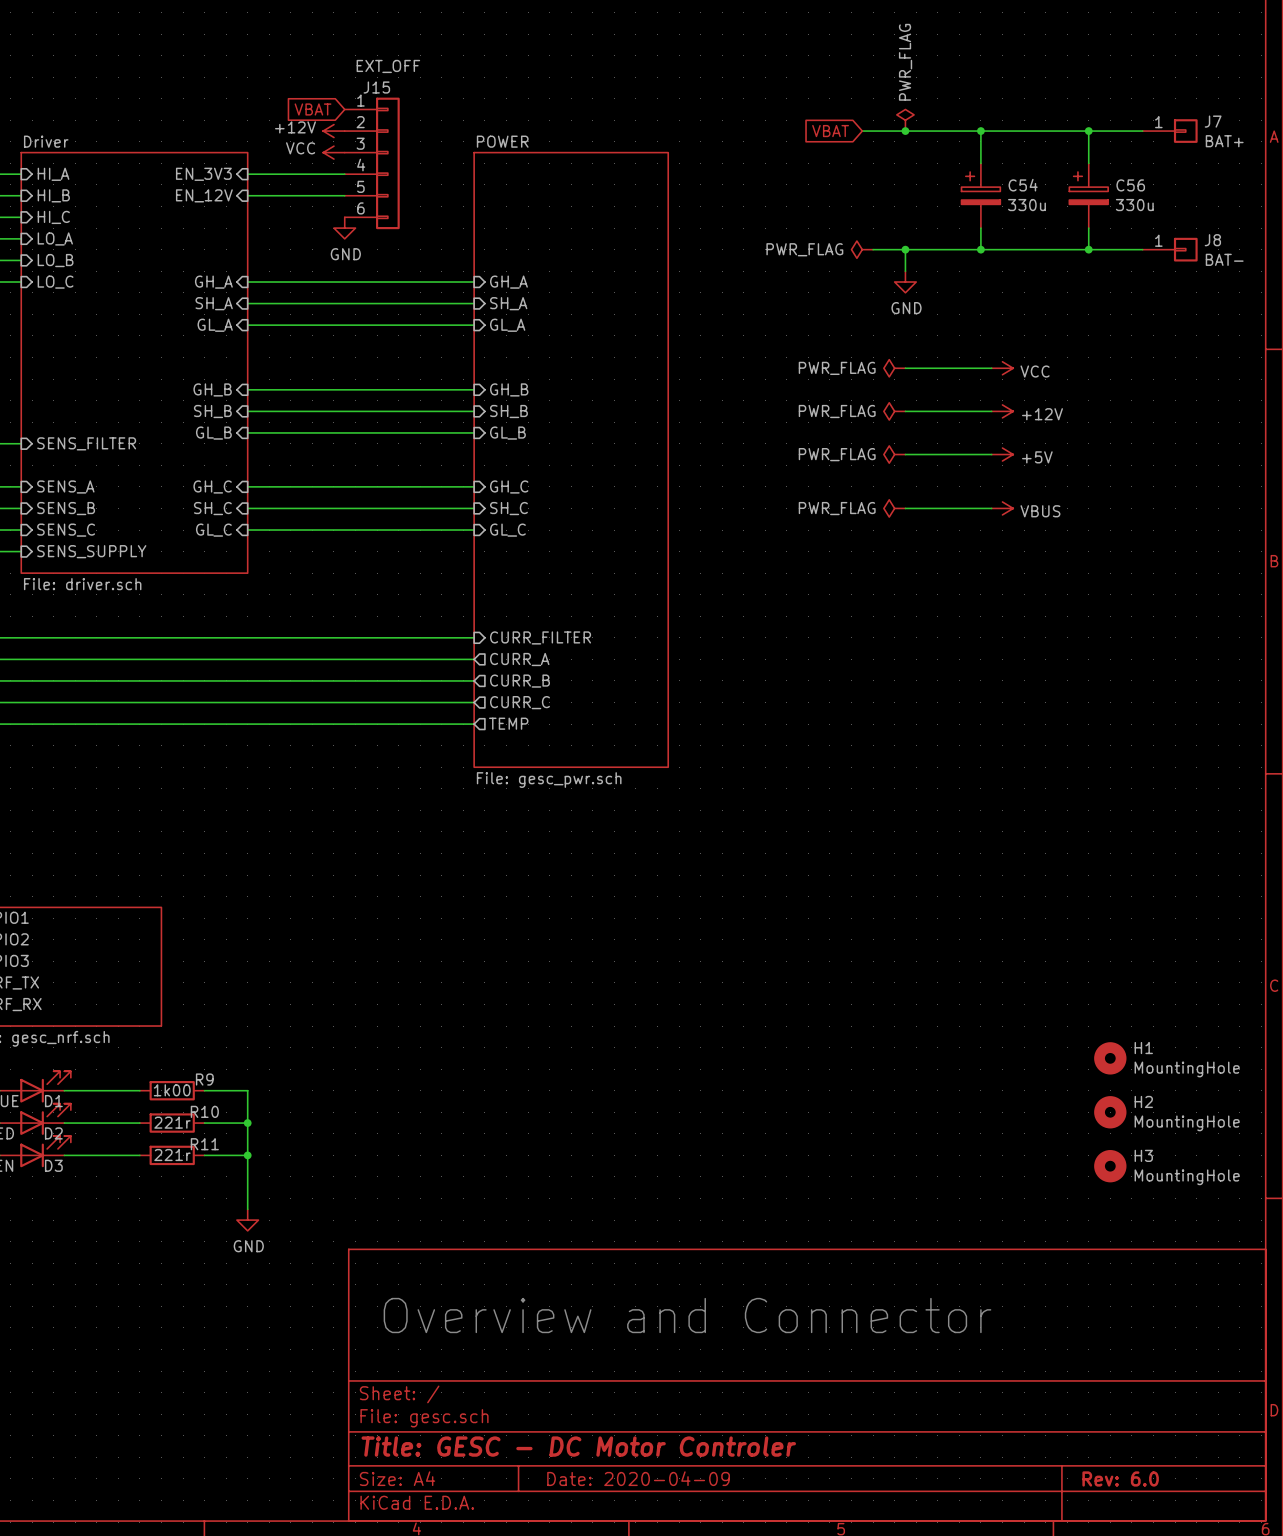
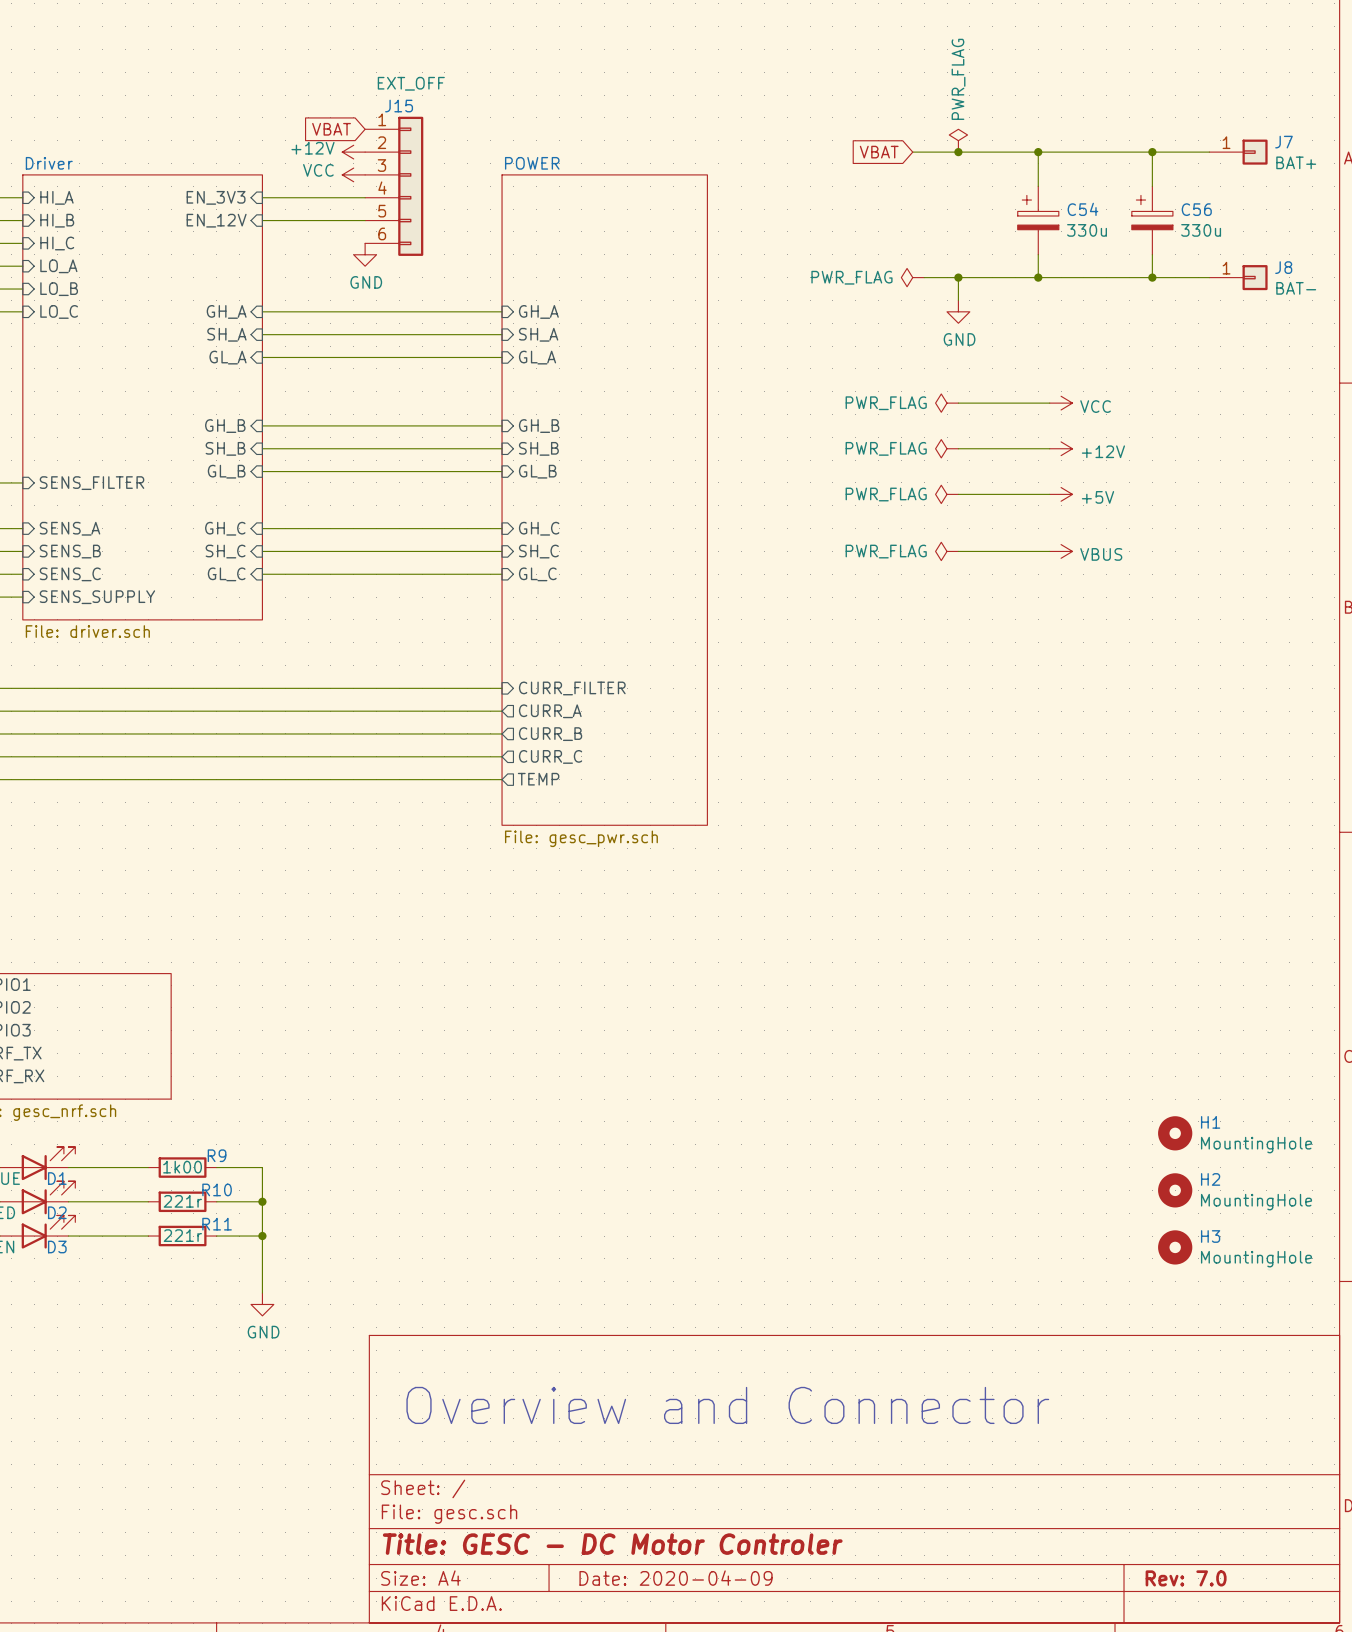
title block: Rev: 6.0 (1120, 1478) -> Rev: 7.0 (1186, 1578)

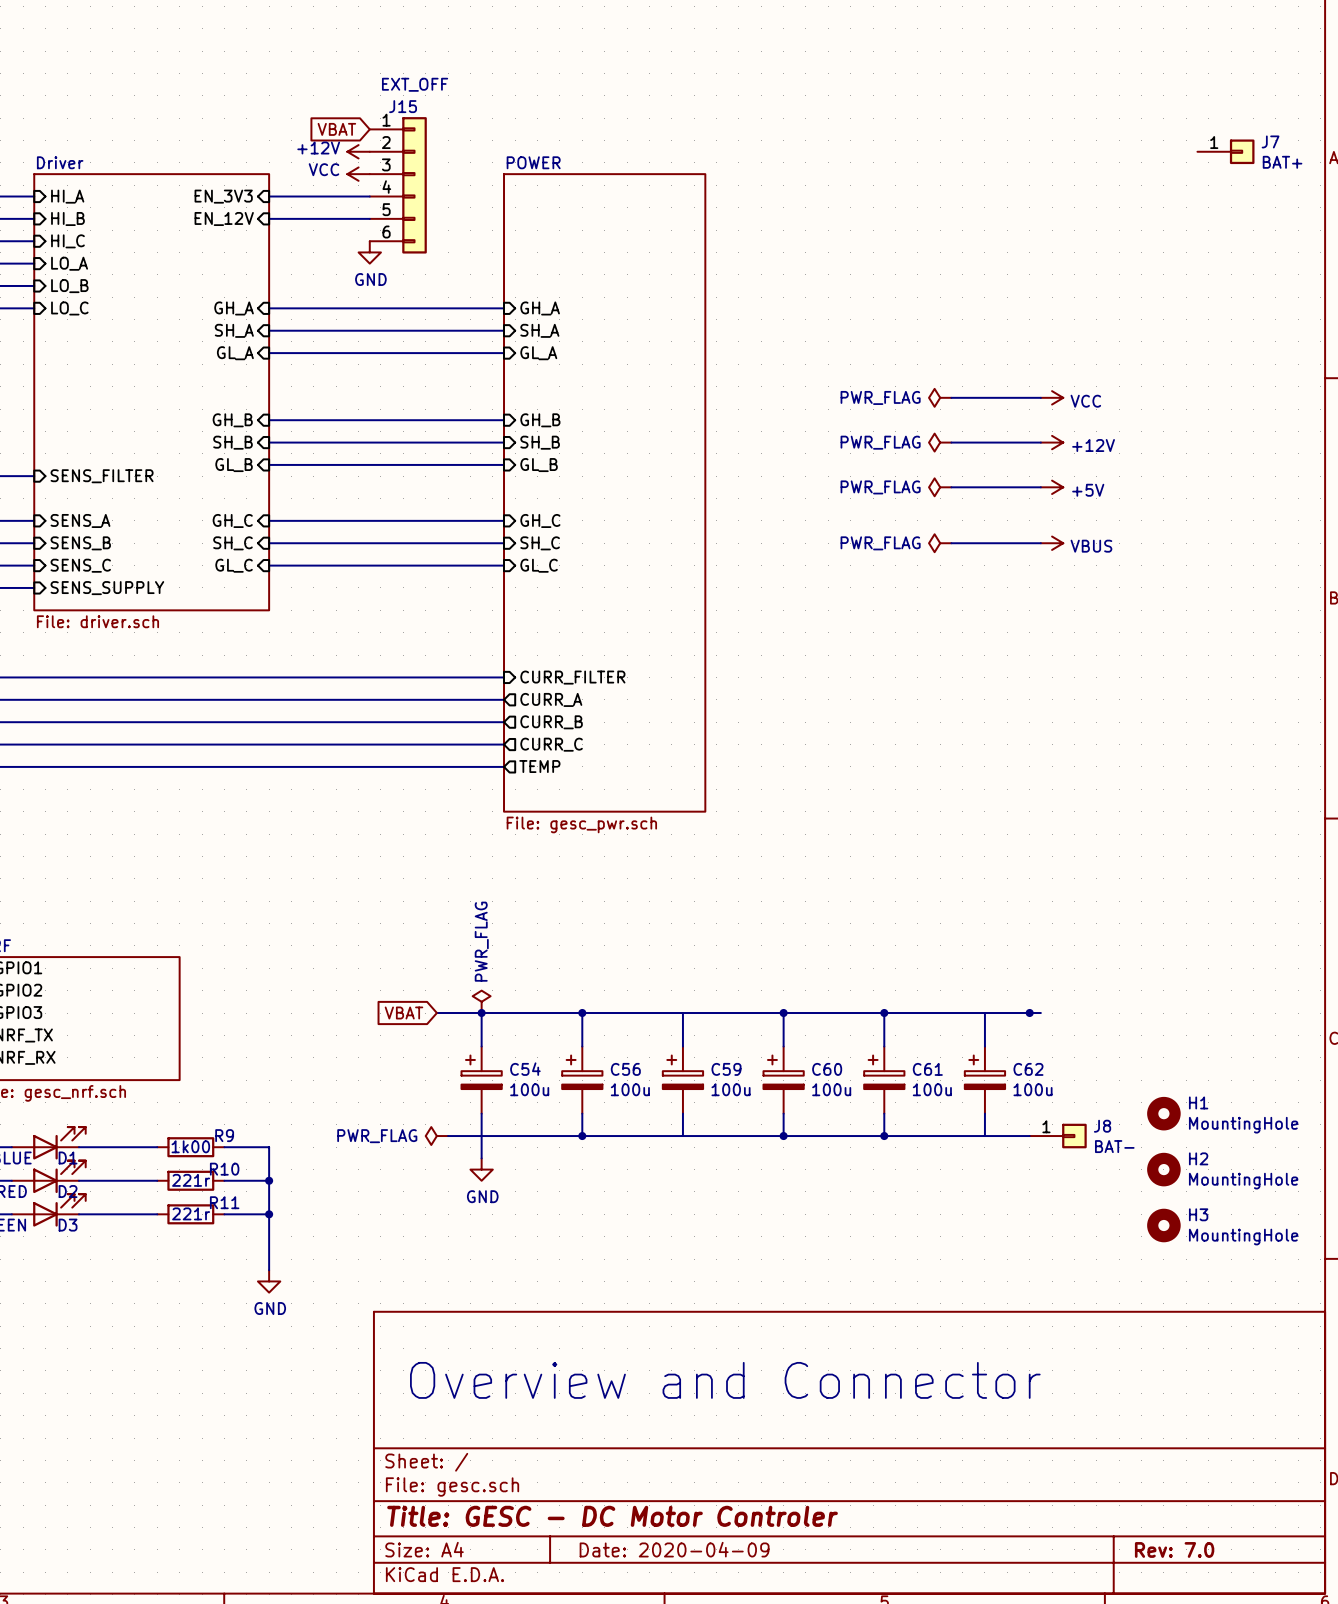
power symbol: PWR_FLAG (958, 140) -> none
global label: VBAT (879, 152) -> none
wire: (912, 152) (1209, 152) -> none
junction: (958, 152) -> none
wire: (1038, 152) (1038, 186) -> none
junction: (1038, 152) -> none
wire: (1152, 152) (1152, 186) -> none
junction: (1152, 152) -> none
C54 position: (1038, 220) -> (481, 1080)
C56 position: (1152, 220) -> (582, 1080)
C54 value: 330u (1087, 230) -> 100u (529, 1089)
C56 value: 330u (1201, 230) -> 100u (630, 1089)
wire: (1038, 254) (1038, 277) -> none
wire: (1152, 254) (1152, 277) -> none
power symbol: PWR_FLAG (912, 277) -> none
wire: (924, 277) (1209, 277) -> none
wire: (958, 277) (958, 300) -> none
junction: (958, 277) -> none
junction: (1038, 277) -> none
junction: (1152, 277) -> none
J8 position: (1238, 277) -> (1058, 1136)
power symbol: GND (958, 311) -> none
power symbol: none -> PWR_FLAG (481, 1001)
global label: none -> VBAT (403, 1013)
wire: none -> (436, 1013) (1040, 1013)
wire: none -> (481, 1013) (481, 1046)
junction: none -> (481, 1013)
wire: none -> (582, 1013) (582, 1046)
junction: none -> (582, 1013)
wire: none -> (682, 1013) (682, 1046)
wire: none -> (783, 1013) (783, 1046)
junction: none -> (783, 1013)
wire: none -> (884, 1013) (884, 1046)
junction: none -> (884, 1013)
wire: none -> (984, 1013) (984, 1046)
junction: none -> (1029, 1013)
C59: none -> 100u (682, 1080)
C60: none -> 100u (783, 1080)
C61: none -> 100u (884, 1080)
C62: none -> 100u (984, 1080)
wire: none -> (481, 1113) (481, 1158)
wire: none -> (582, 1113) (582, 1136)
wire: none -> (682, 1113) (682, 1136)
wire: none -> (783, 1113) (783, 1136)
wire: none -> (884, 1113) (884, 1136)
wire: none -> (984, 1113) (984, 1136)
power symbol: none -> PWR_FLAG (436, 1136)
wire: none -> (448, 1136) (1029, 1136)
junction: none -> (582, 1136)
junction: none -> (783, 1136)
junction: none -> (884, 1136)
power symbol: none -> GND (481, 1169)

